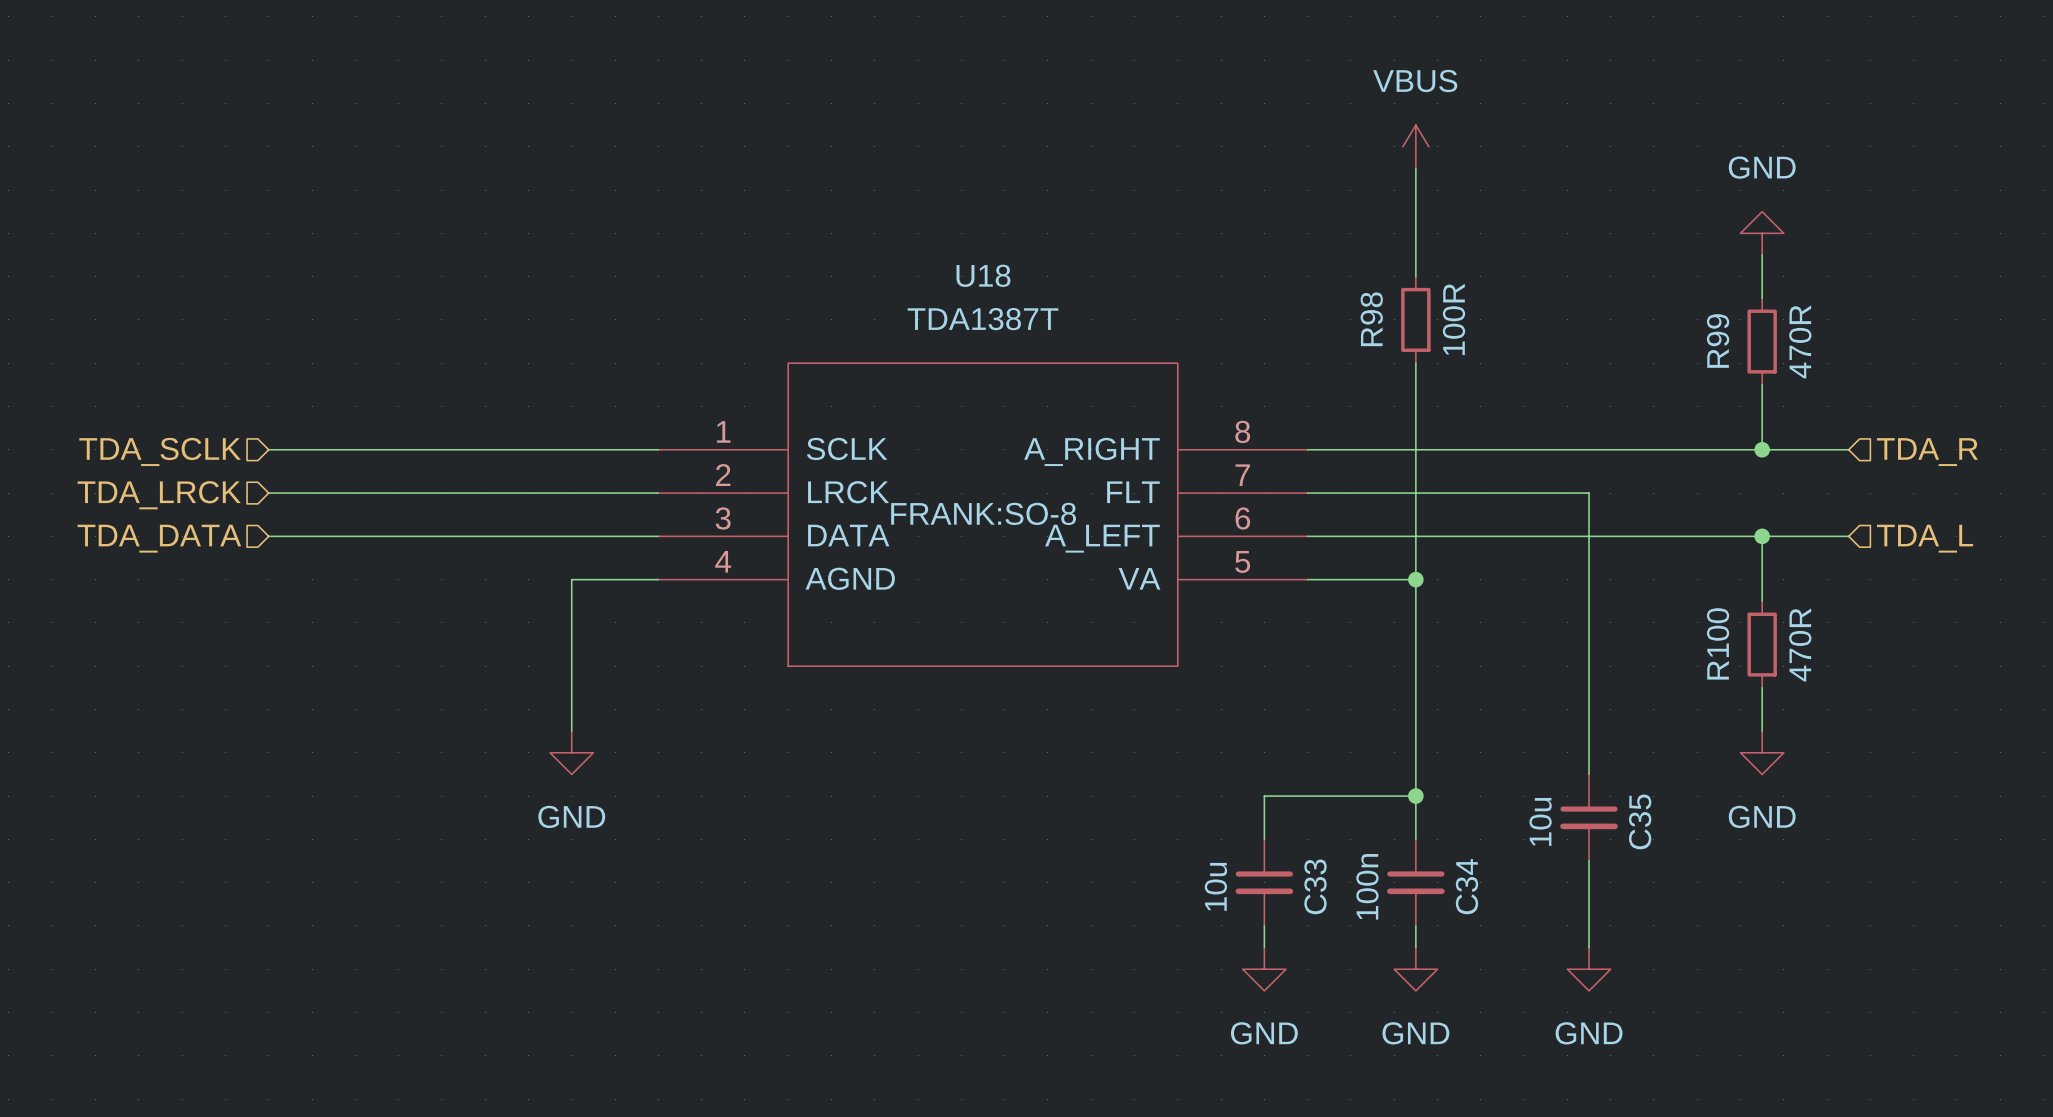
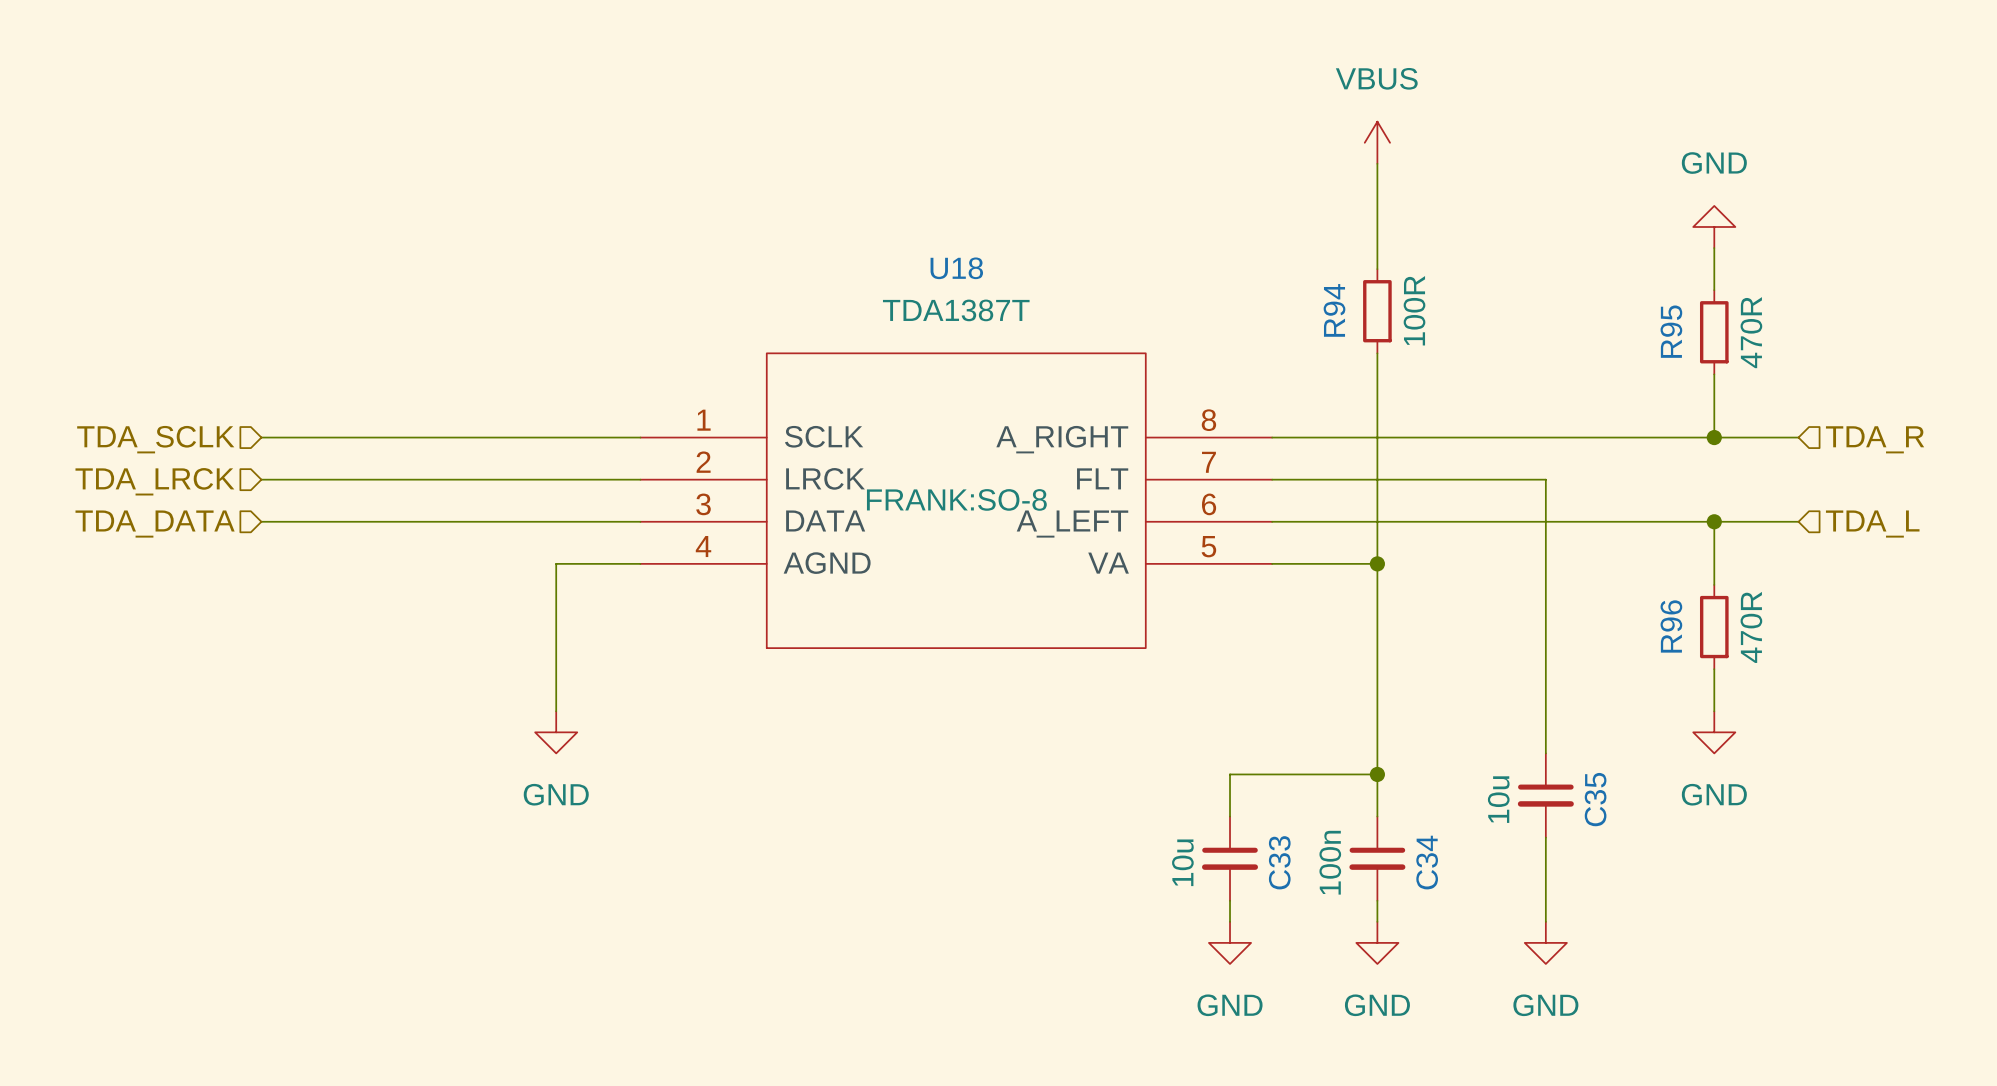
R98 name: R98 (1371, 319) -> R94 (1334, 310)
R99 name: R99 (1718, 341) -> R95 (1671, 331)
R100 name: R100 (1718, 643) -> R96 (1671, 626)

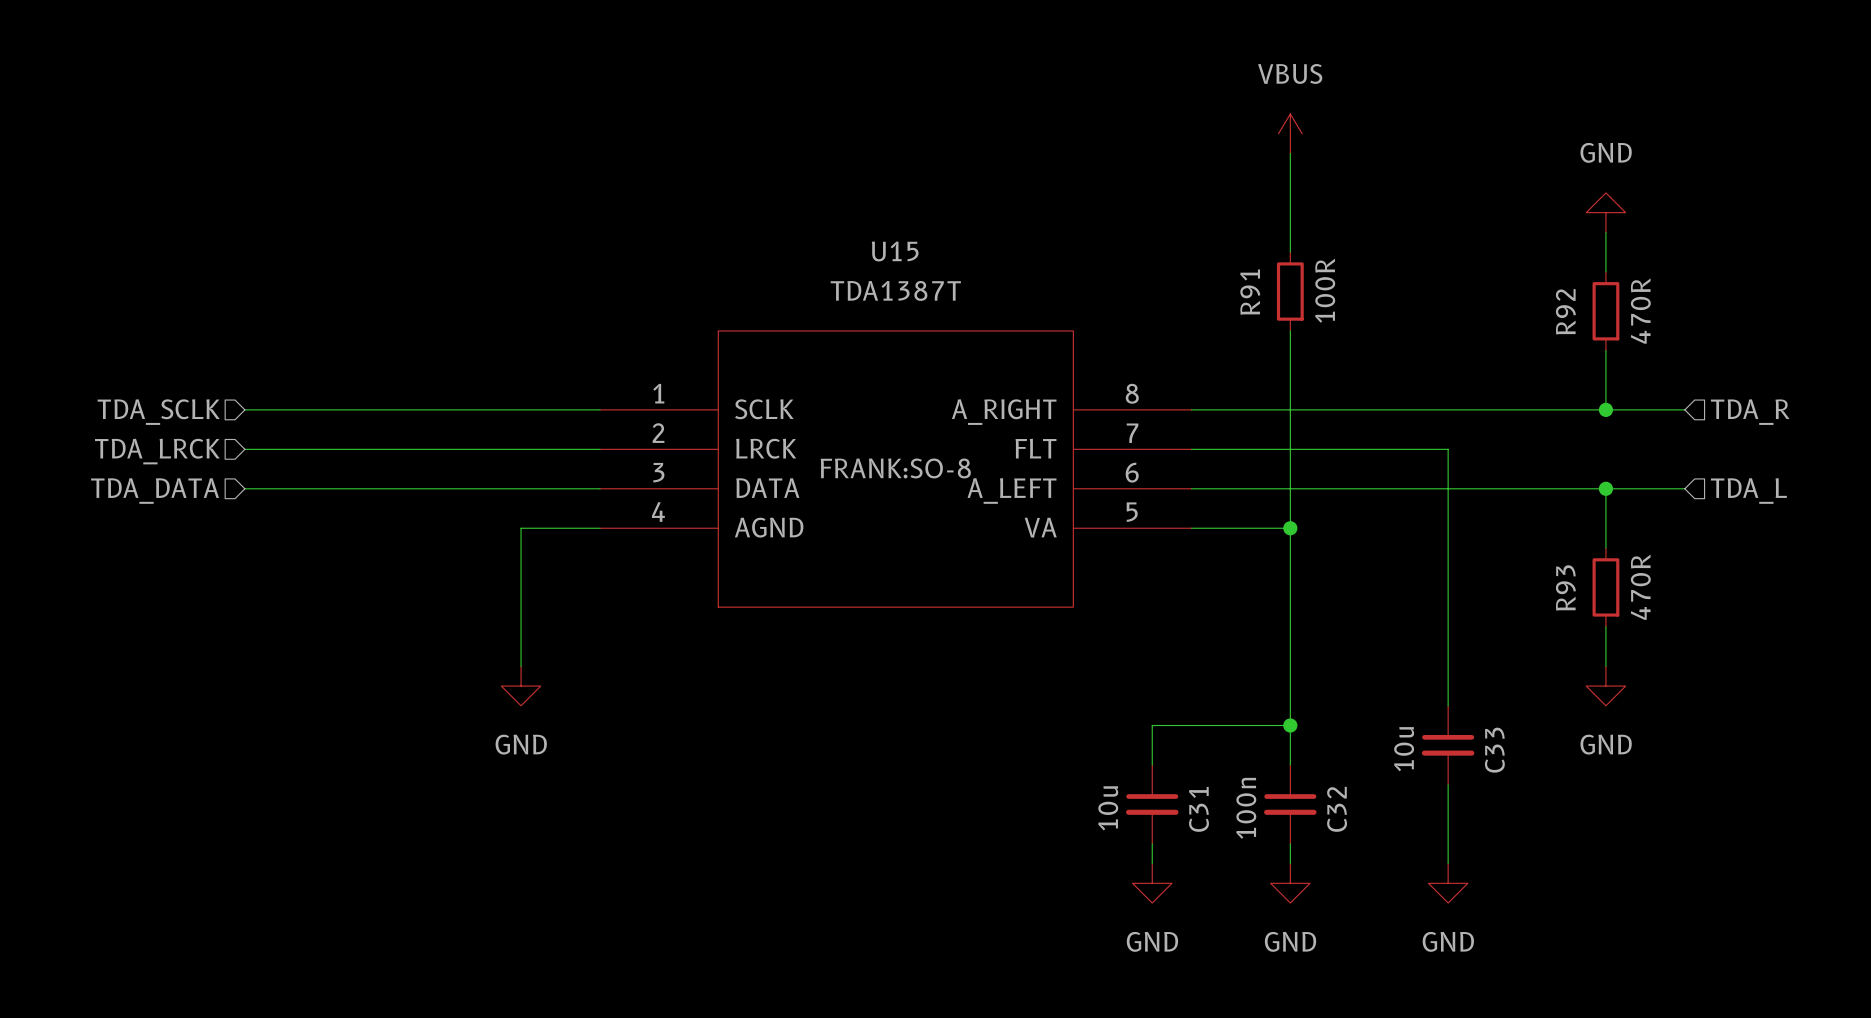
U18 name: U18 (956, 268) -> U15 (895, 251)
R94 name: R94 (1334, 310) -> R91 (1250, 292)
R95 name: R95 (1671, 331) -> R92 (1565, 311)
R96 name: R96 (1671, 626) -> R93 (1565, 587)
C35 name: C35 (1595, 799) -> C33 (1494, 750)
C33 name: C33 (1279, 862) -> C31 (1198, 809)
C34 name: C34 (1427, 862) -> C32 (1337, 809)

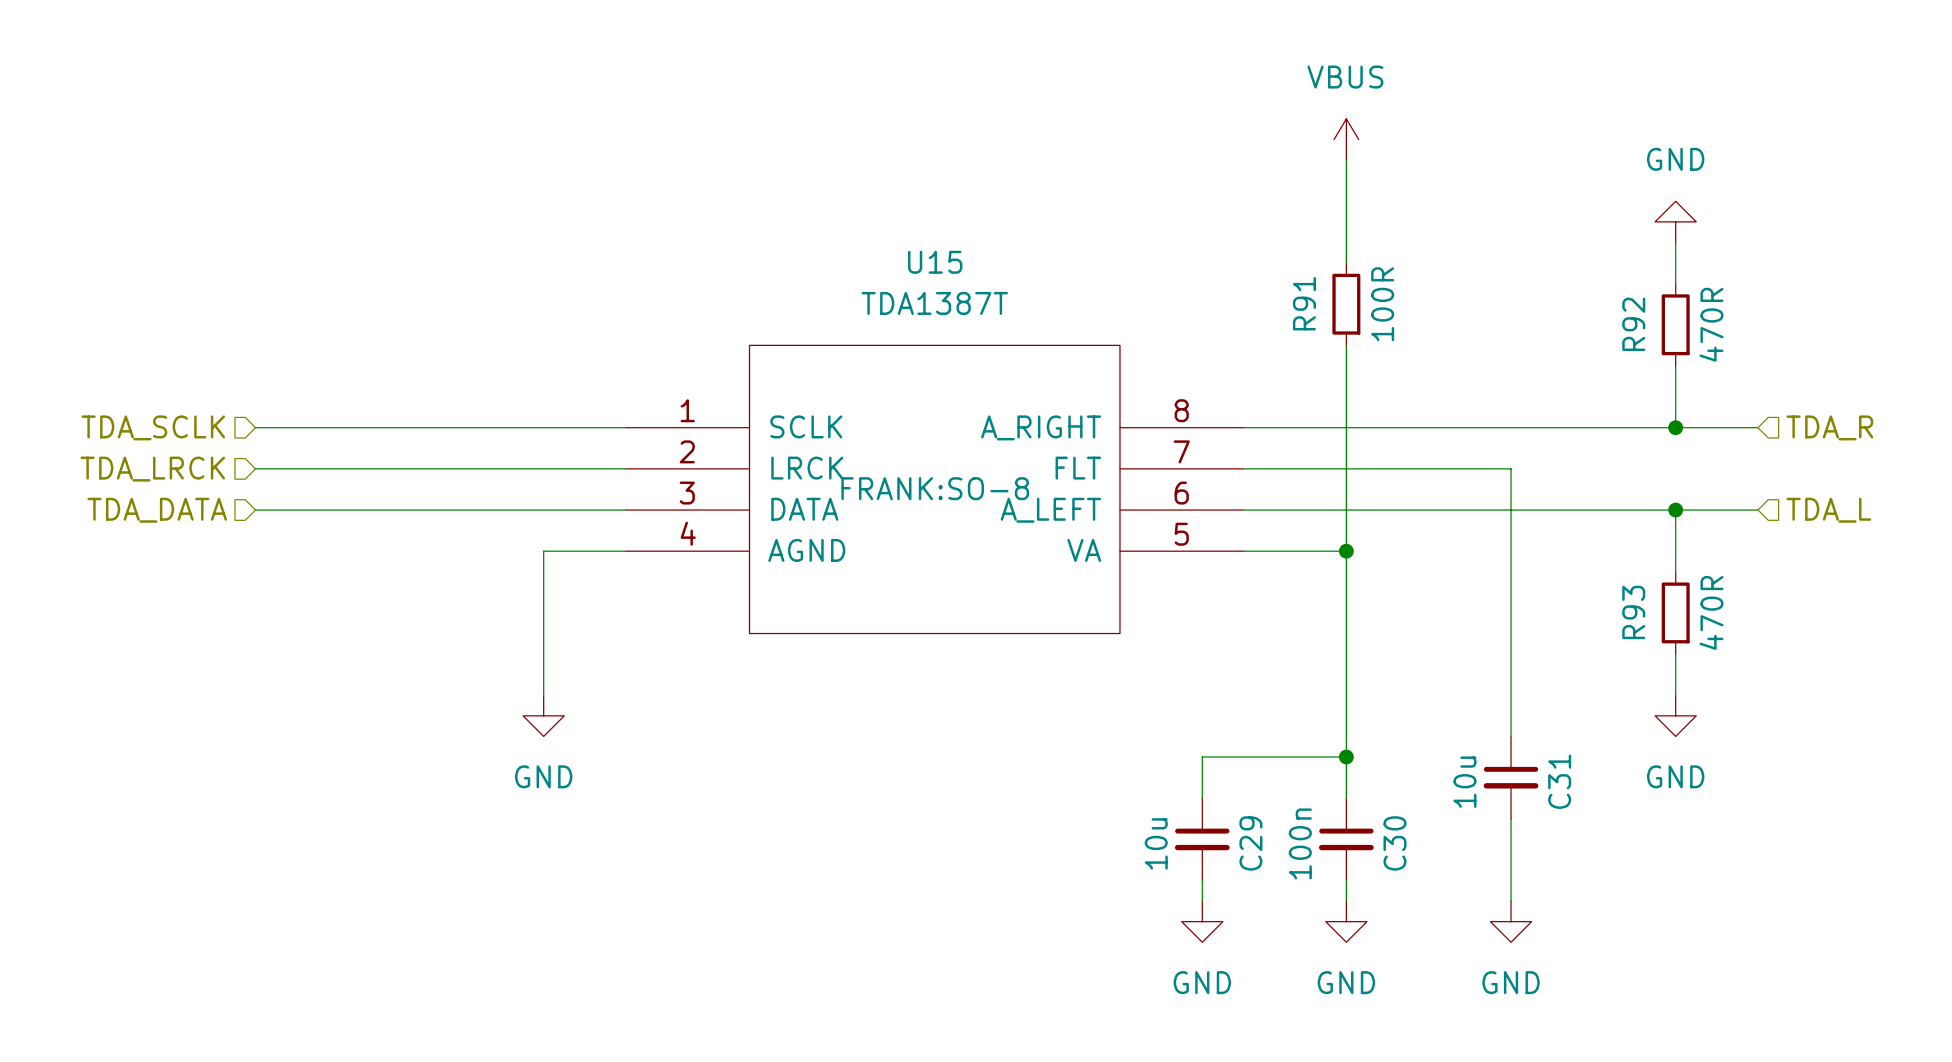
C33 name: C33 (1494, 750) -> C31 (1559, 781)
C31 name: C31 (1198, 809) -> C29 (1250, 843)
C32 name: C32 (1337, 809) -> C30 (1395, 843)

